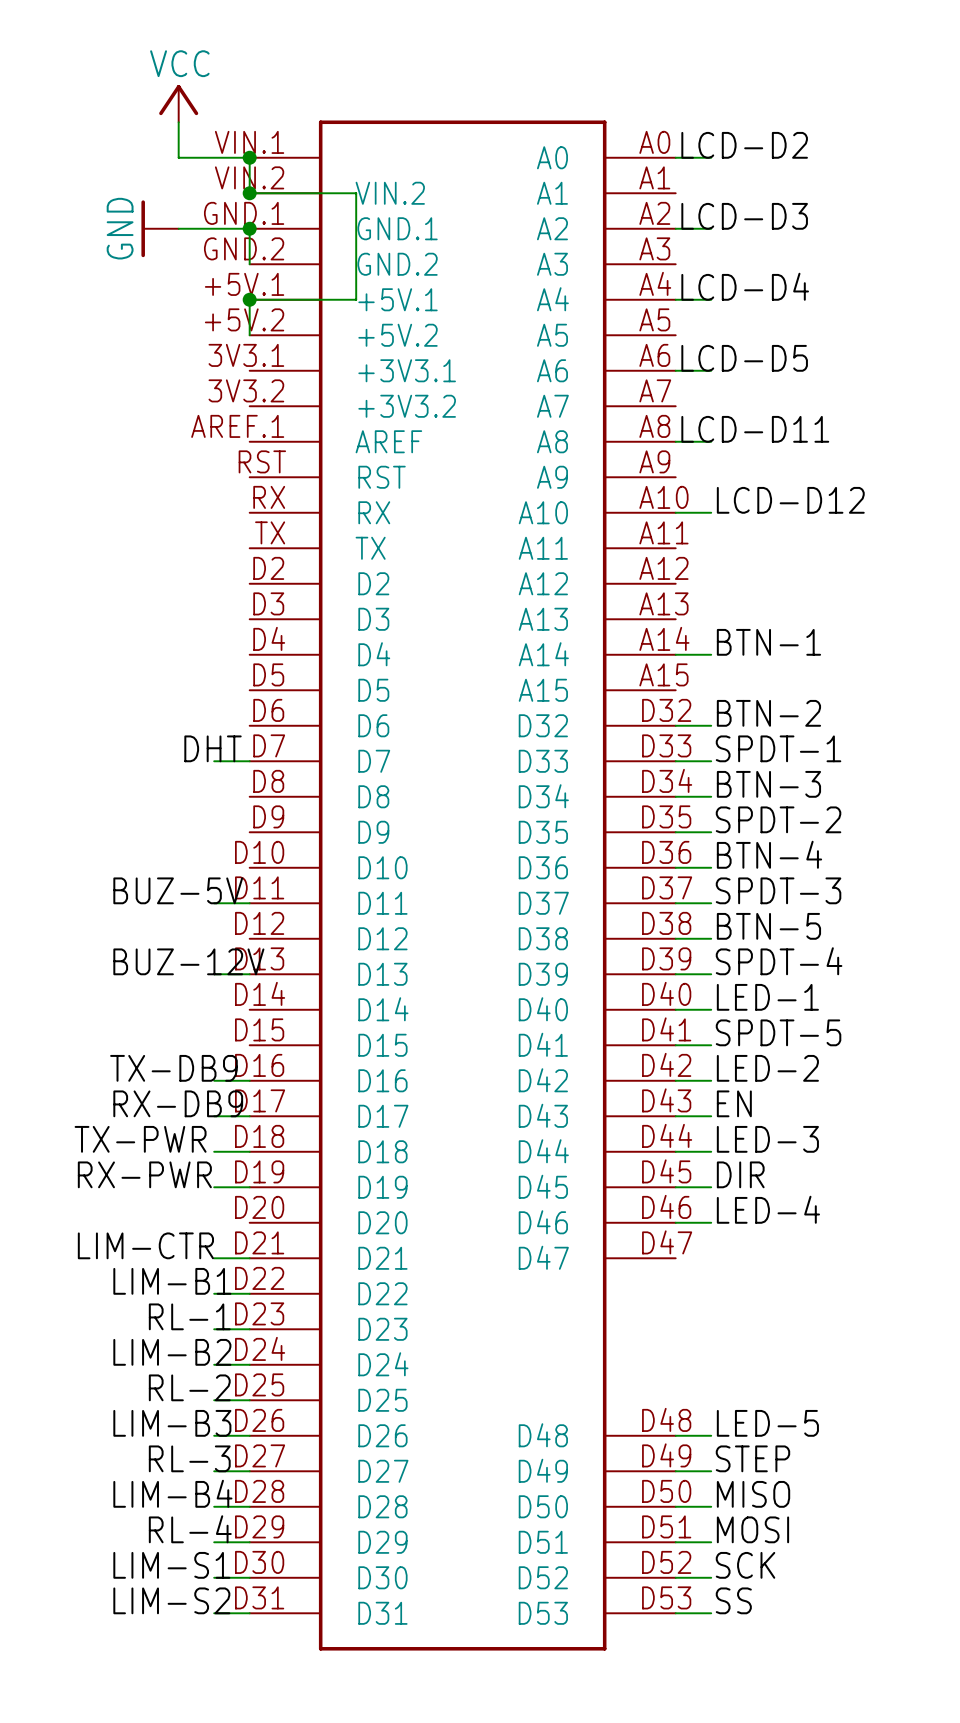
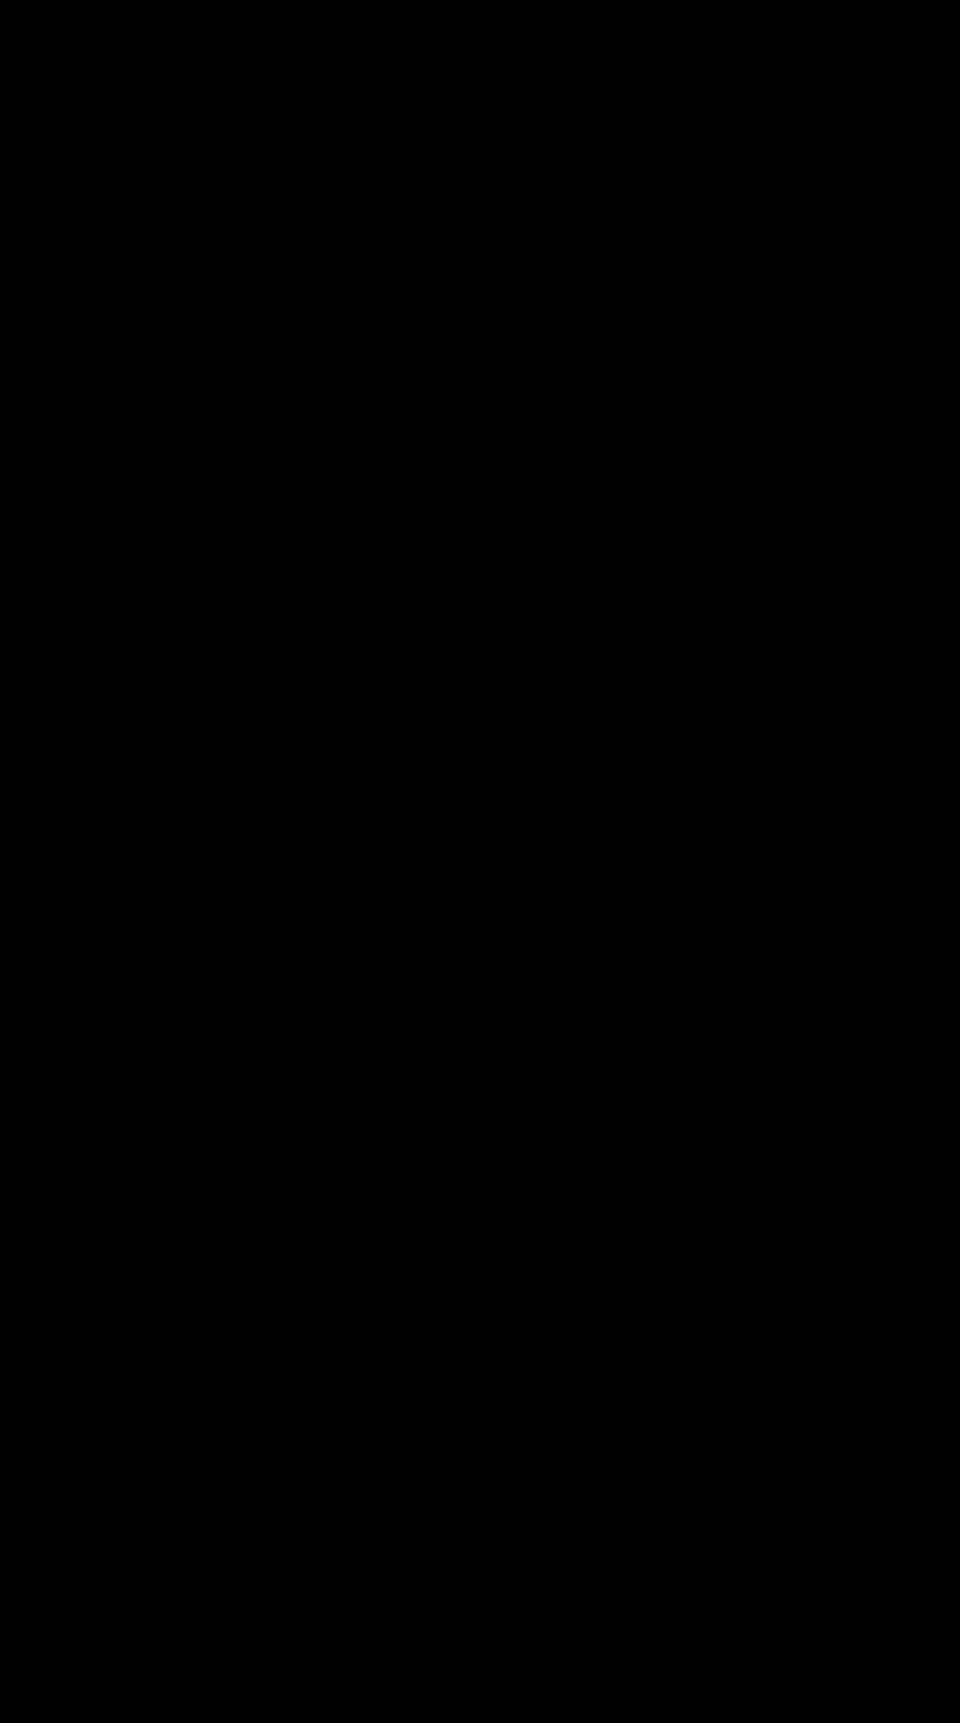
power symbol: VCC (178, 103) -> none
wire: (178, 122) (178, 157) (249, 157) (249, 193) (356, 193) (356, 299) (249, 299) (249, 335) -> none
label: LCD-D2 (744, 145) -> none
junction: (249, 157) -> none
wire: (675, 157) (711, 157) -> none
junction: (249, 193) -> none
label: LCD-D3 (744, 216) -> none
power symbol: GND (160, 228) -> none
wire: (178, 228) (249, 228) (249, 264) -> none
junction: (249, 228) -> none
wire: (675, 228) (711, 228) -> none
label: LCD-D4 (745, 286) -> none
junction: (249, 299) -> none
wire: (675, 299) (711, 299) -> none
label: LCD-D5 (744, 358) -> none
wire: (675, 370) (711, 370) -> none
label: LCD-D11 (755, 429) -> none
wire: (675, 441) (711, 441) -> none
label: LCD-D12 (790, 500) -> none
wire: (675, 512) (711, 512) -> none
label: BTN-1 (768, 642) -> none
wire: (675, 654) (711, 654) -> none
label: BTN-2 (768, 713) -> none
wire: (675, 725) (711, 725) -> none
label: DHT (213, 748) -> none
label: SPDT-1 (778, 748) -> none
wire: (214, 761) (249, 761) -> none
wire: (675, 761) (711, 761) -> none
label: BTN-3 (768, 784) -> none
wire: (675, 796) (711, 796) -> none
label: SPDT-2 (778, 819) -> none
wire: (675, 832) (711, 832) -> none
label: BTN-4 (769, 854) -> none
wire: (675, 867) (711, 867) -> none
part: (462, 885) -> none
label: BUZ-5V (178, 890) -> none
label: SPDT-3 (778, 890) -> none
wire: (214, 903) (249, 903) -> none
wire: (675, 903) (711, 903) -> none
label: BTN-5 (768, 926) -> none
wire: (675, 938) (711, 938) -> none
label: BUZ-12V (188, 961) -> none
label: SPDT-4 (779, 961) -> none
wire: (214, 974) (249, 974) -> none
wire: (675, 974) (711, 974) -> none
label: LED-1 (767, 997) -> none
wire: (675, 1009) (711, 1009) -> none
label: SPDT-5 (778, 1032) -> none
wire: (675, 1045) (711, 1045) -> none
label: TX-DB9 (173, 1068) -> none
label: LED-2 (767, 1068) -> none
wire: (214, 1080) (249, 1080) -> none
wire: (675, 1080) (711, 1080) -> none
label: RX-DB9 (178, 1103) -> none
label: EN (734, 1103) -> none
wire: (214, 1116) (249, 1116) -> none
wire: (675, 1116) (711, 1116) -> none
label: TX-PWR (140, 1139) -> none
label: LED-3 (767, 1139) -> none
wire: (214, 1151) (249, 1151) -> none
wire: (675, 1151) (711, 1151) -> none
label: RX-PWR (144, 1174) -> none
label: DIR (740, 1174) -> none
wire: (214, 1187) (249, 1187) -> none
wire: (675, 1187) (711, 1187) -> none
label: LED-4 (768, 1209) -> none
wire: (675, 1222) (711, 1222) -> none
label: LIM-CTR (145, 1245) -> none
wire: (214, 1258) (249, 1258) -> none
label: LIM-B1 (172, 1281) -> none
wire: (214, 1293) (249, 1293) -> none
label: RL-1 (189, 1316) -> none
wire: (214, 1329) (249, 1329) -> none
label: LIM-B2 (172, 1352) -> none
wire: (214, 1364) (249, 1364) -> none
label: RL-2 (189, 1387) -> none
wire: (214, 1400) (249, 1400) -> none
label: LIM-B3 (172, 1423) -> none
label: LED-5 (767, 1423) -> none
wire: (214, 1435) (249, 1435) -> none
wire: (675, 1435) (711, 1435) -> none
label: RL-3 (189, 1458) -> none
label: STEP (752, 1458) -> none
wire: (214, 1471) (249, 1471) -> none
wire: (675, 1471) (711, 1471) -> none
label: LIM-B4 (172, 1493) -> none
label: MISO (753, 1494) -> none
wire: (214, 1506) (249, 1506) -> none
wire: (675, 1506) (711, 1506) -> none
label: RL-4 (190, 1529) -> none
label: MOSI (752, 1529) -> none
wire: (214, 1542) (249, 1542) -> none
wire: (675, 1542) (711, 1542) -> none
label: LIM-S1 (171, 1565) -> none
label: SCK (745, 1565) -> none
wire: (214, 1577) (249, 1577) -> none
wire: (675, 1577) (711, 1577) -> none
label: LIM-S2 (171, 1600) -> none
label: SS (733, 1600) -> none
wire: (214, 1613) (249, 1613) -> none
wire: (675, 1613) (711, 1613) -> none

